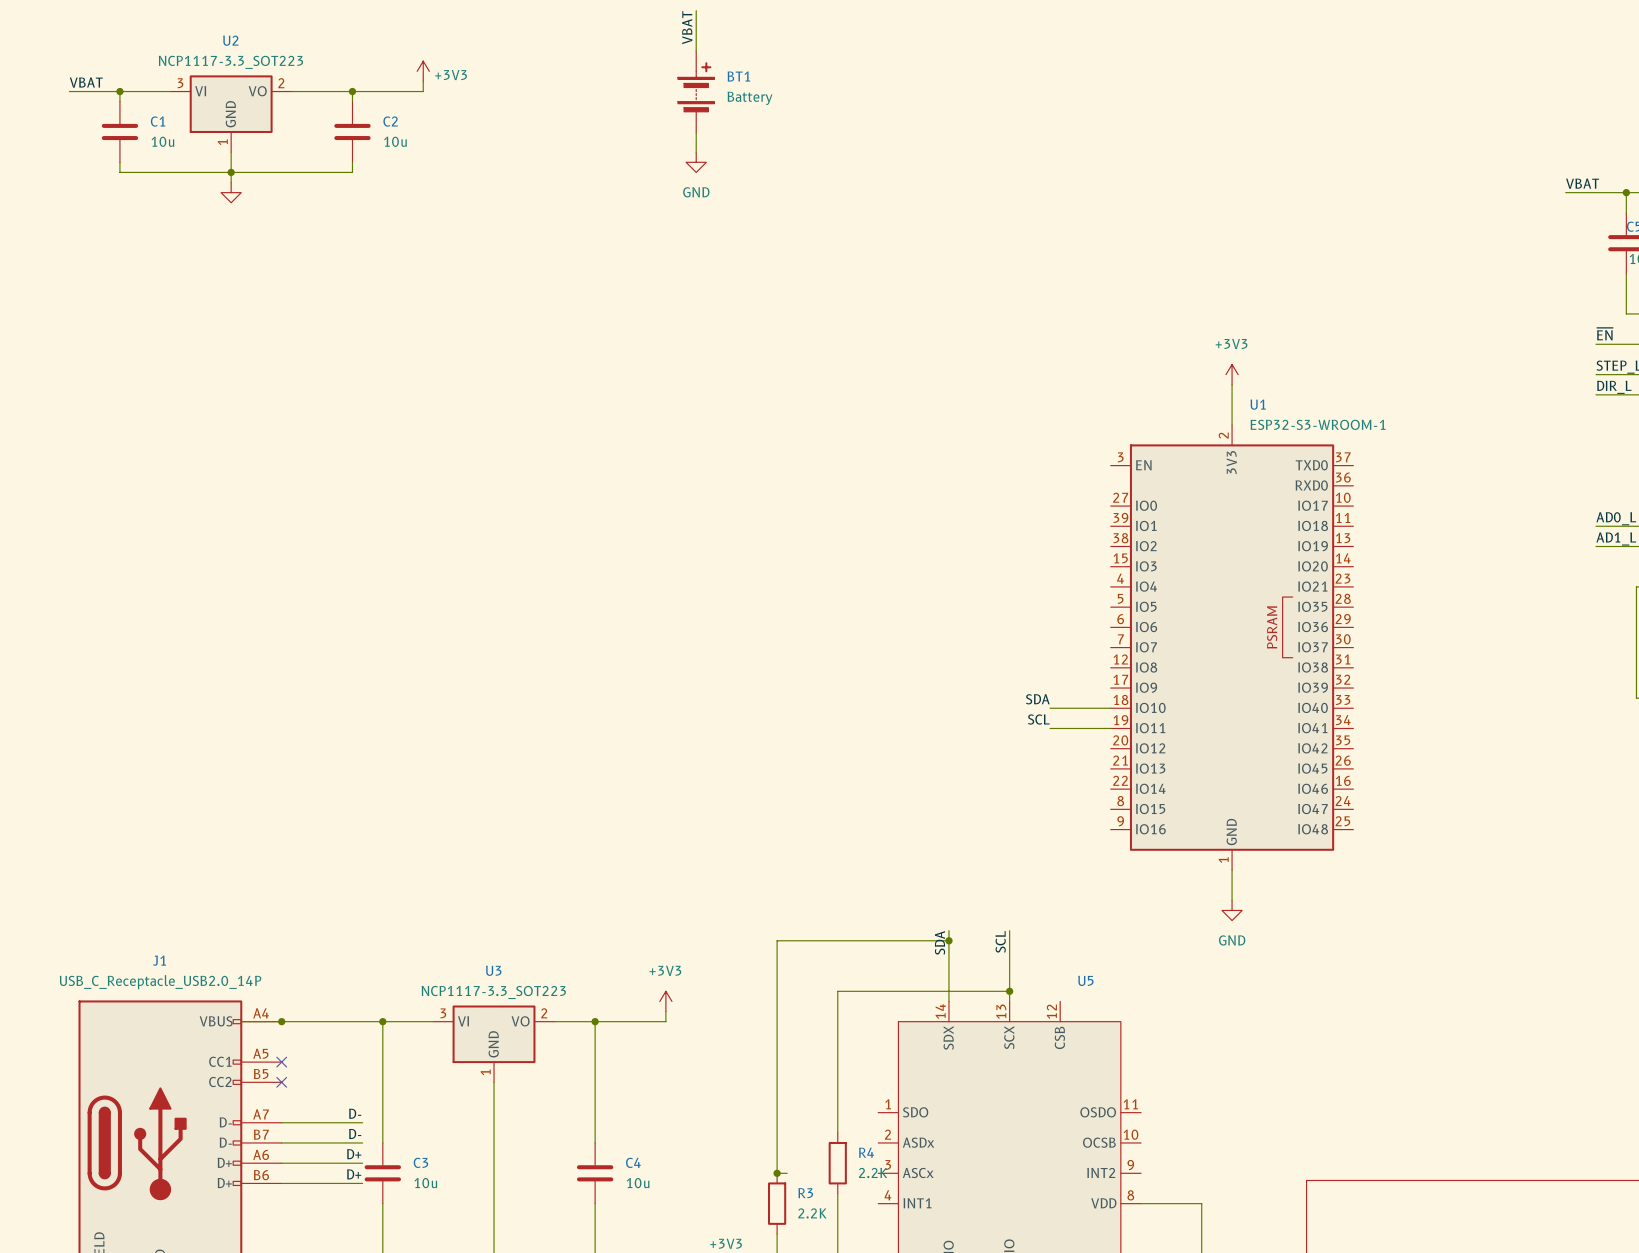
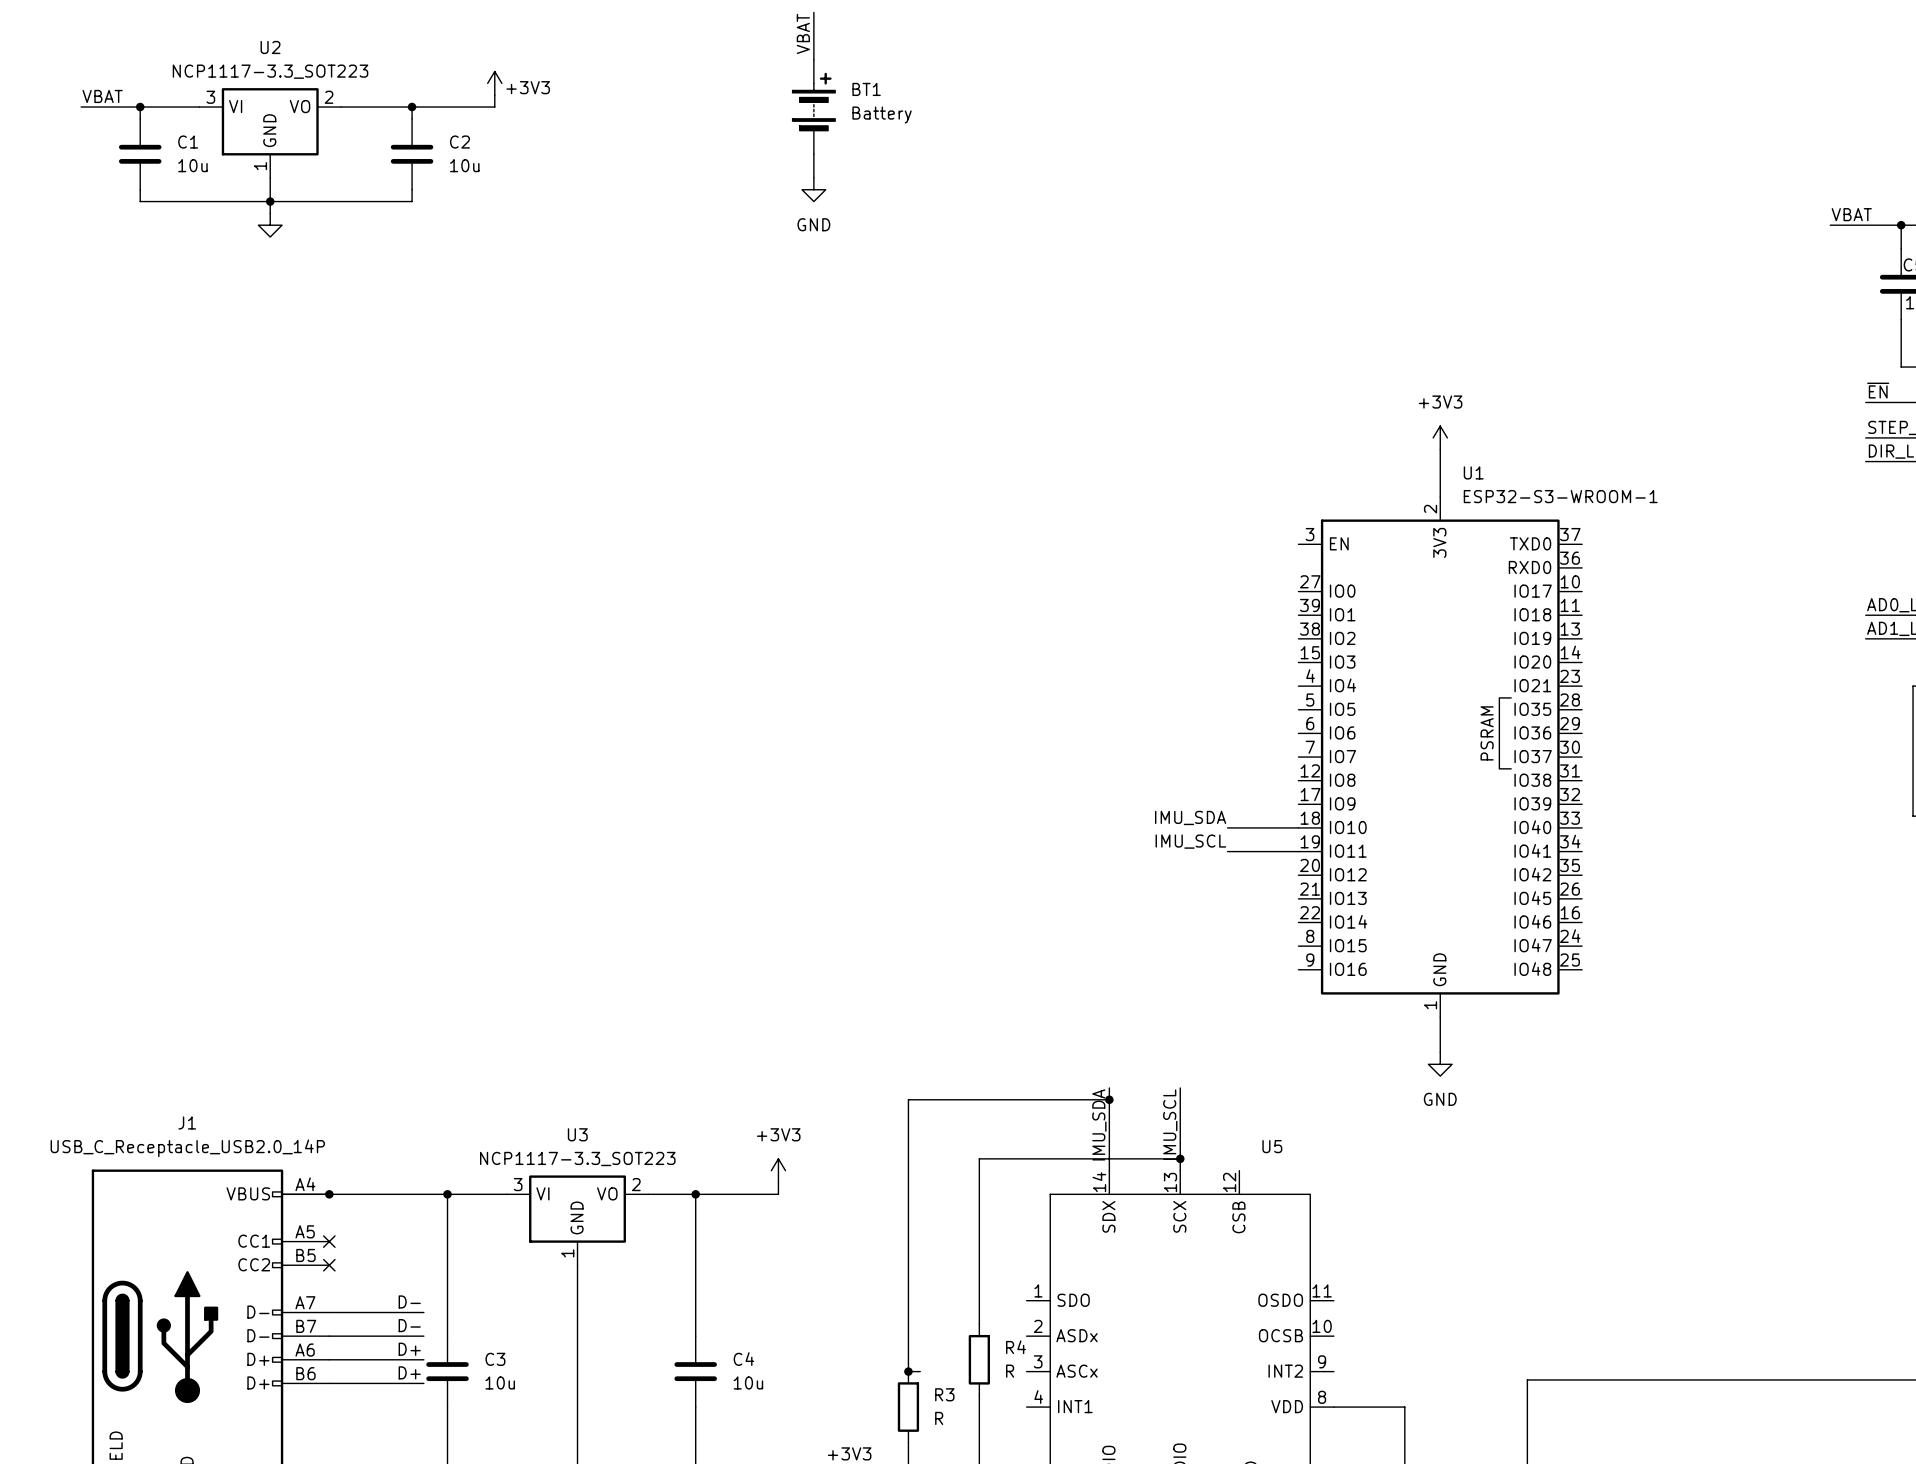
label: SDA (1037, 699) -> IMU_SDA (1190, 817)
label: SCL (1038, 719) -> IMU_SCL (1190, 841)
label: SCL (1000, 941) -> IMU_SCL (1170, 1124)
label: SDA (940, 942) -> IMU_SDA (1099, 1124)
R4 value: 2.2K (873, 1172) -> R (1010, 1371)
R3 value: 2.2K (812, 1213) -> R (939, 1418)

